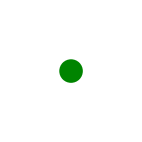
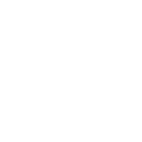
junction: (71, 71) -> none

